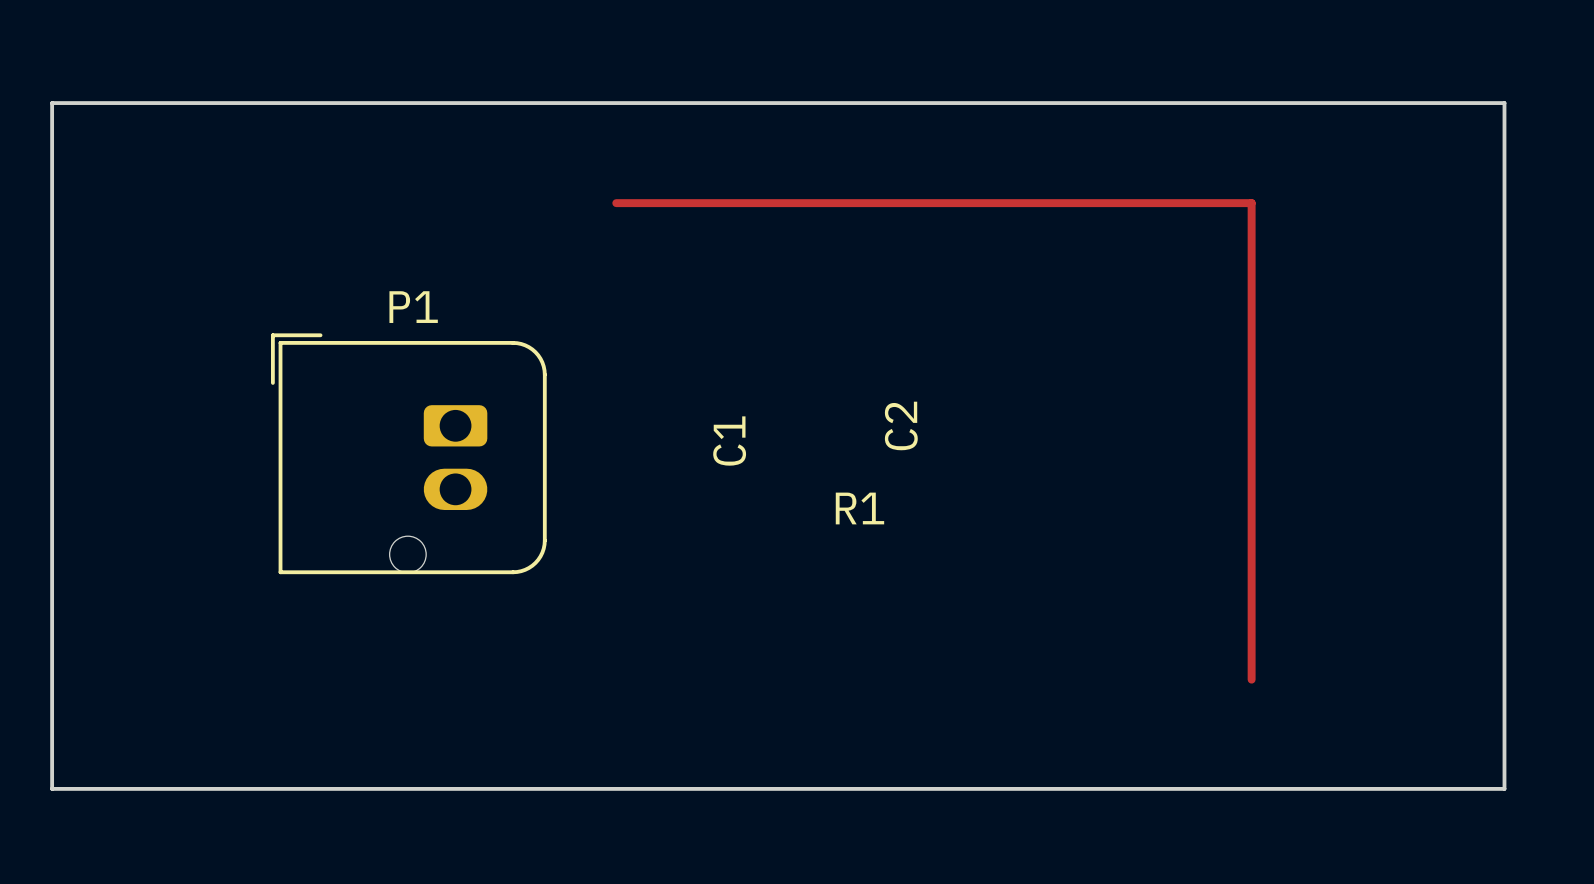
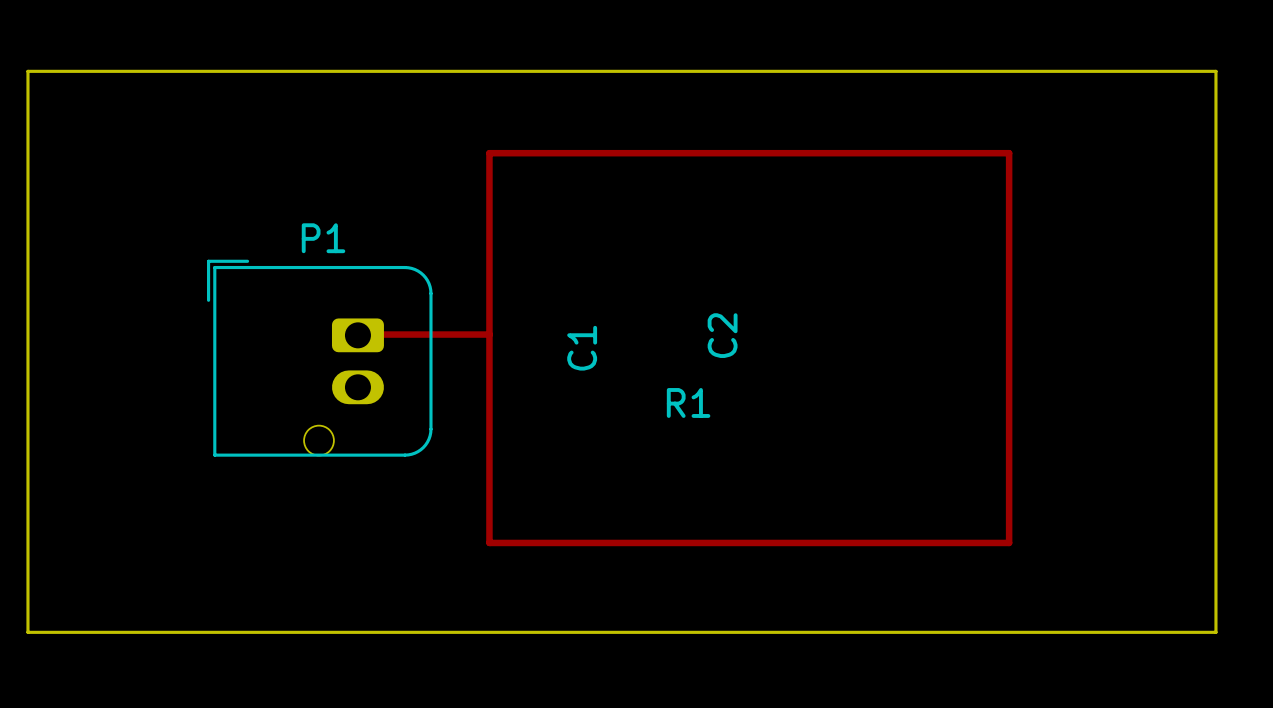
track: none -> (489, 153) (489, 542)
track: none -> (489, 334) (357, 335)
track: none -> (489, 542) (1009, 542)

